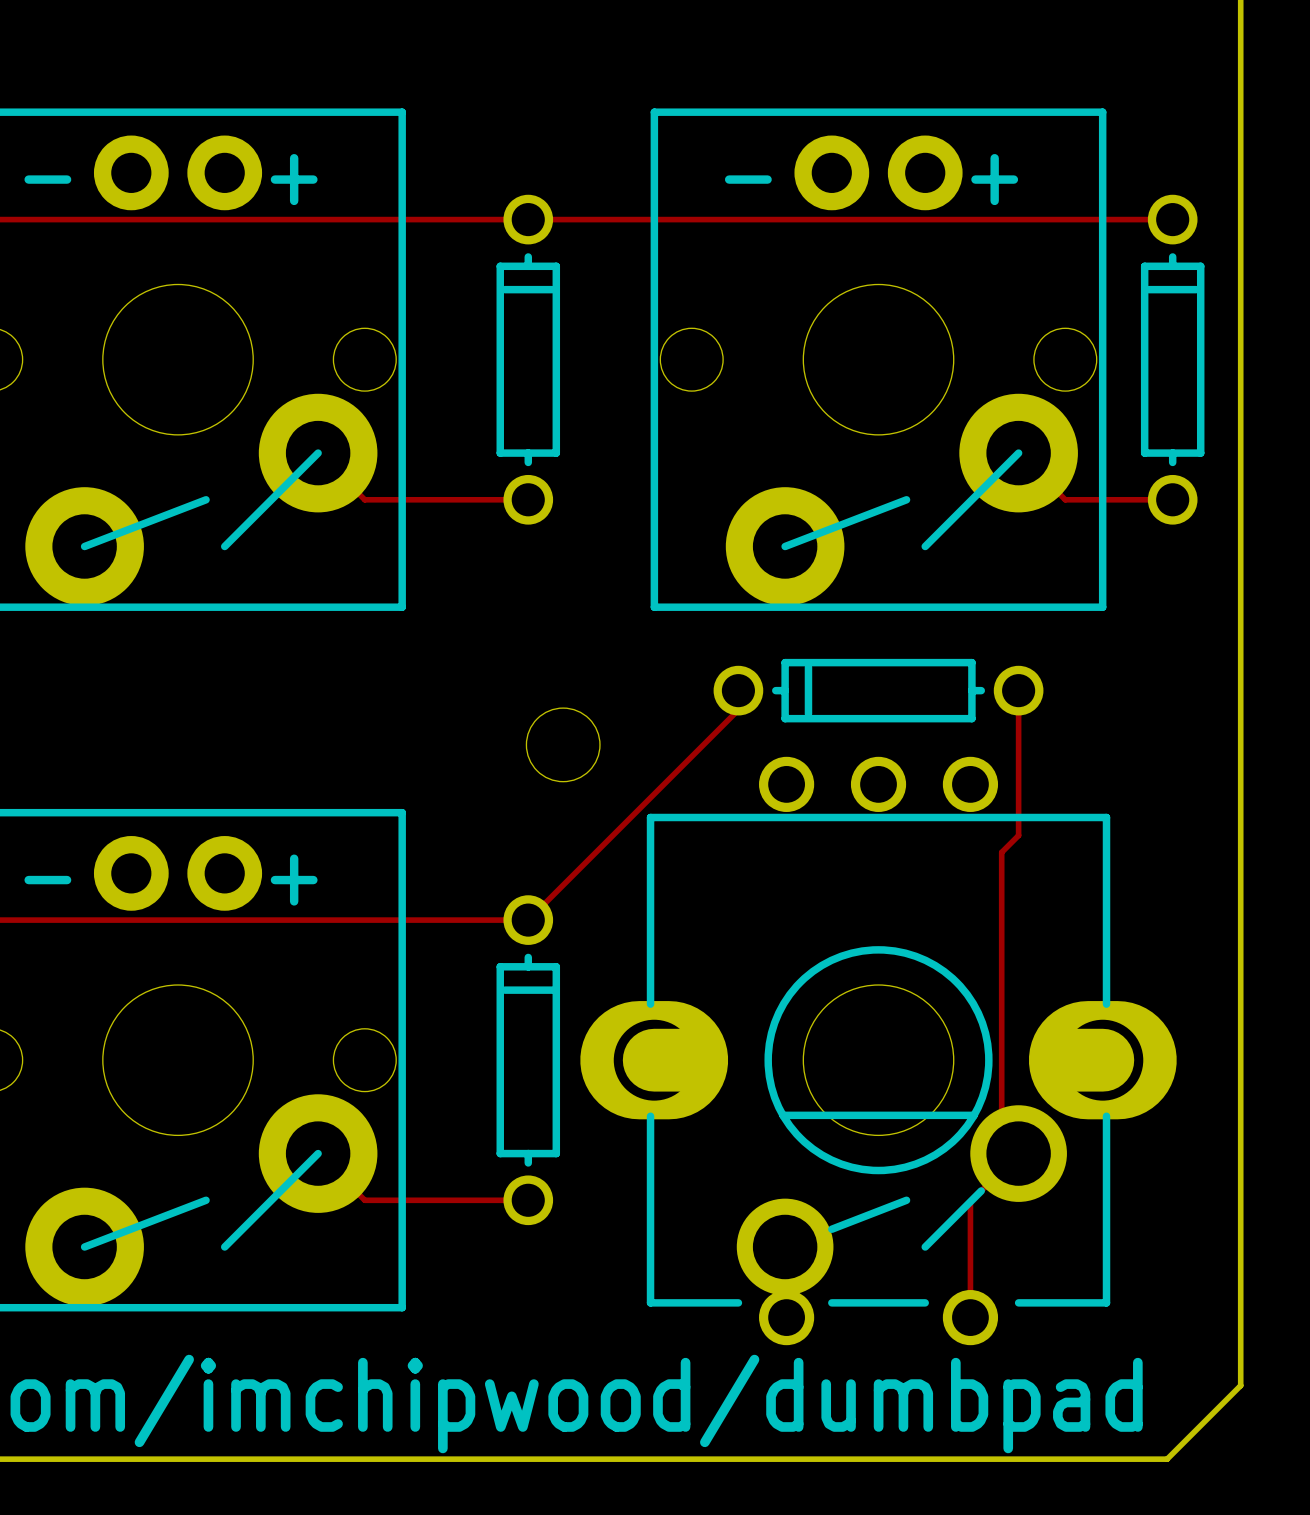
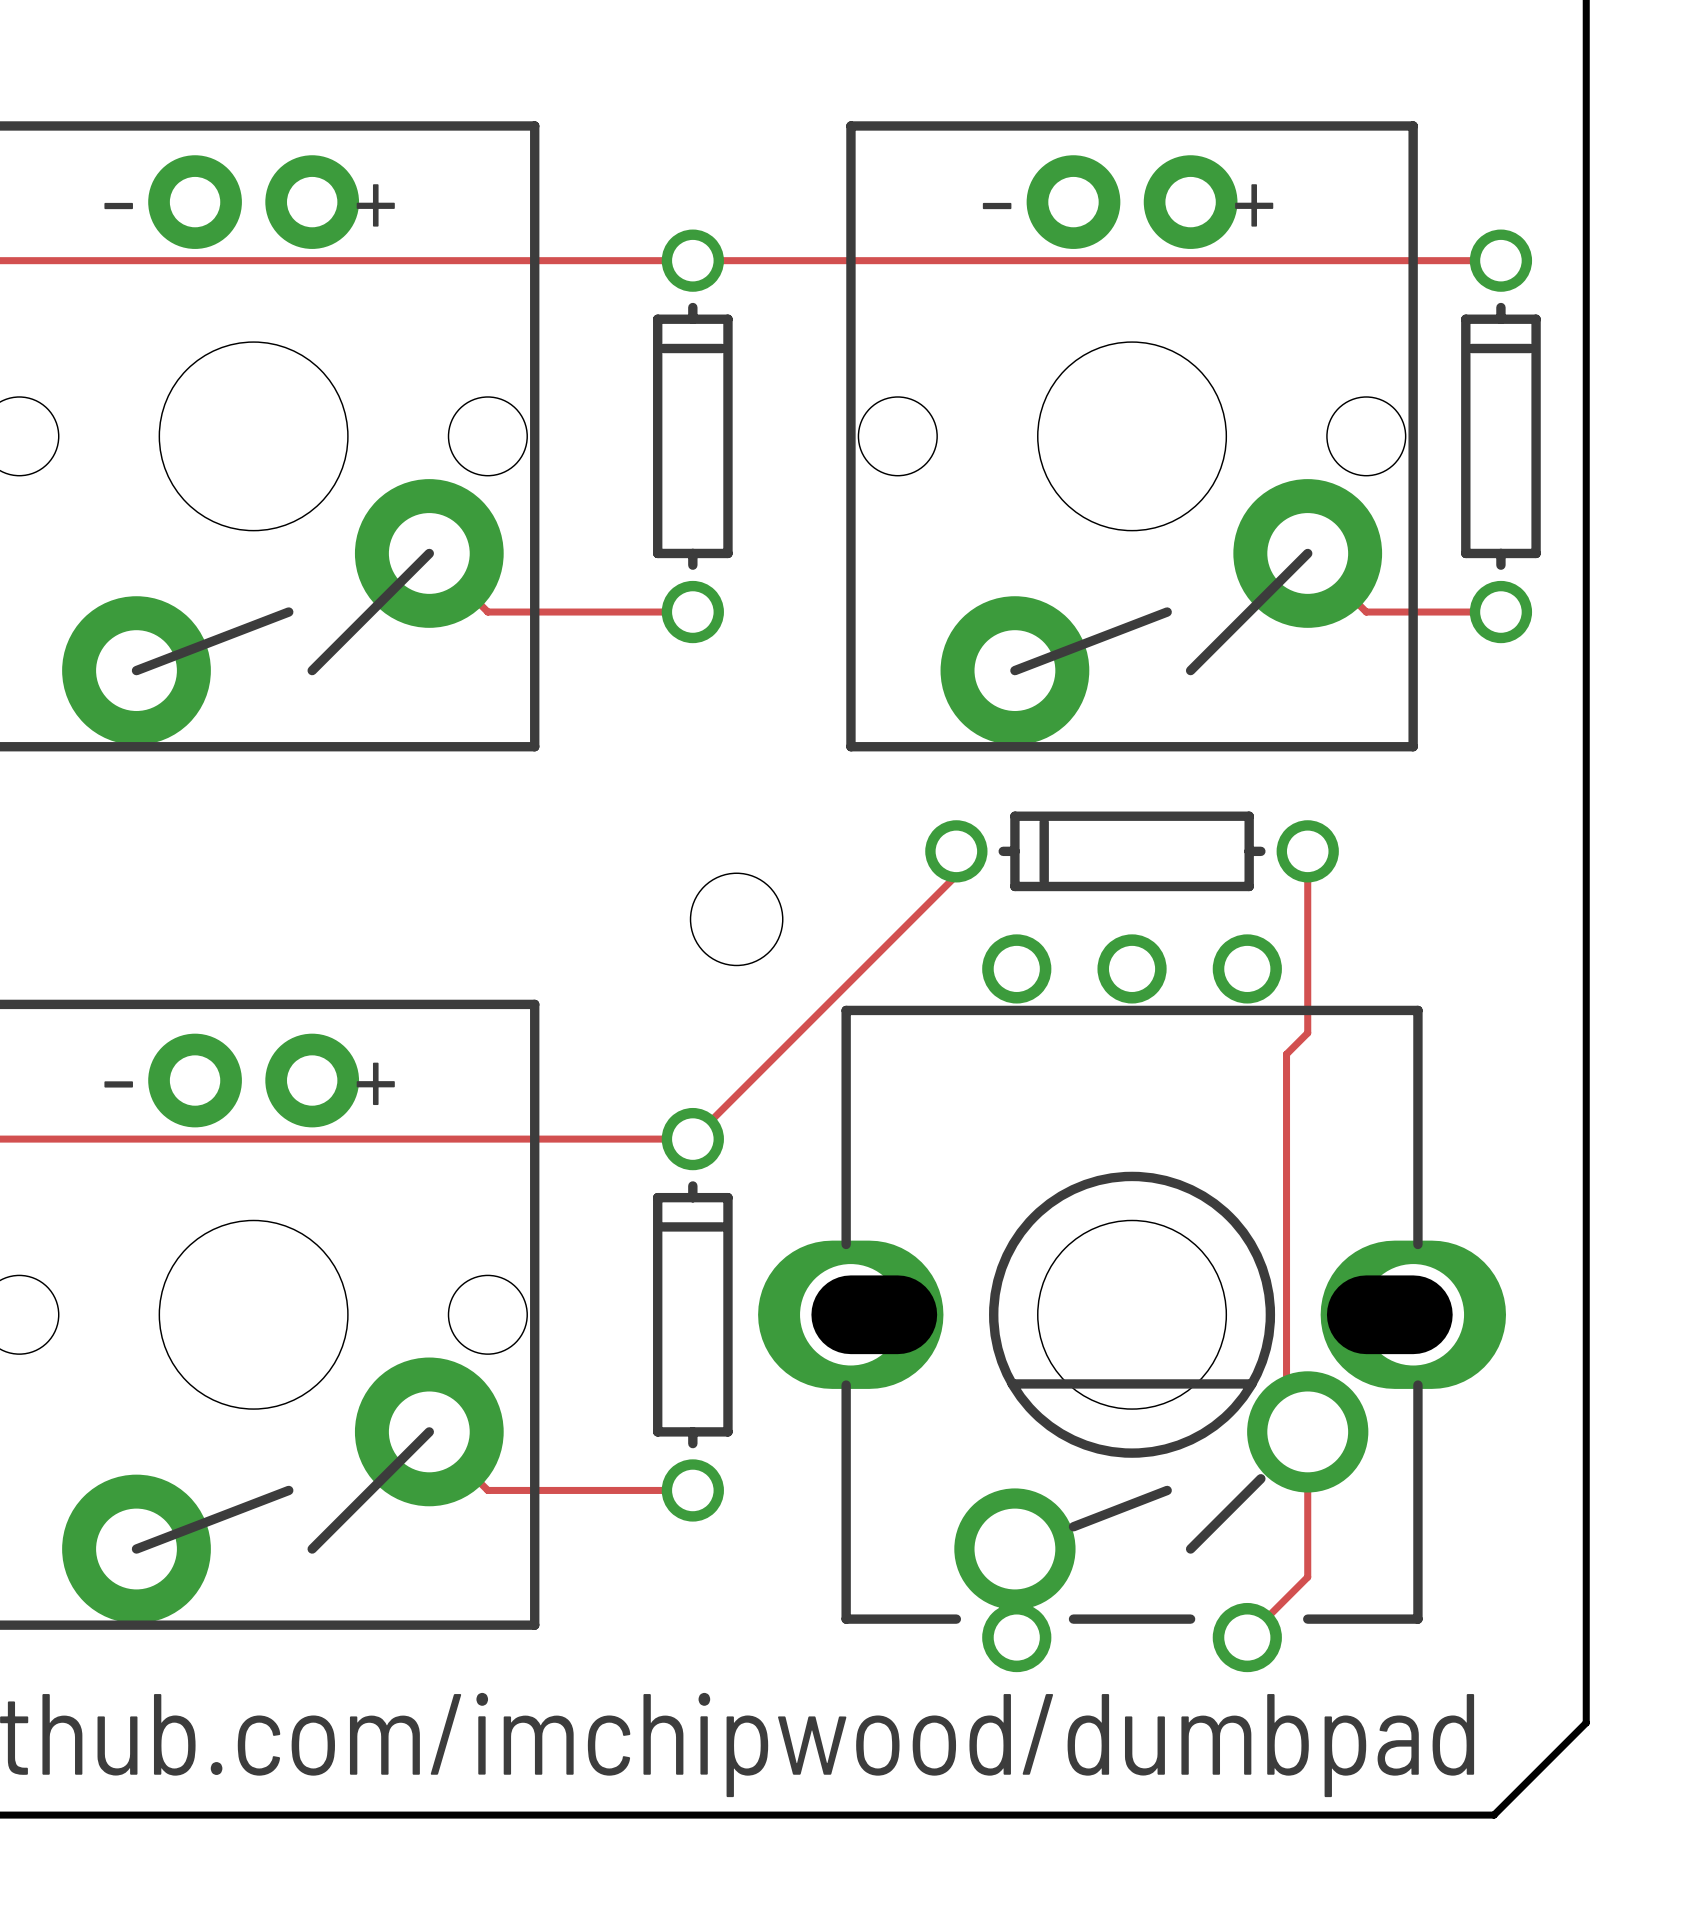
track: (1018, 1153) (970, 1201) (970, 1317) -> (1307, 1431) (1307, 1577) (1247, 1637)

